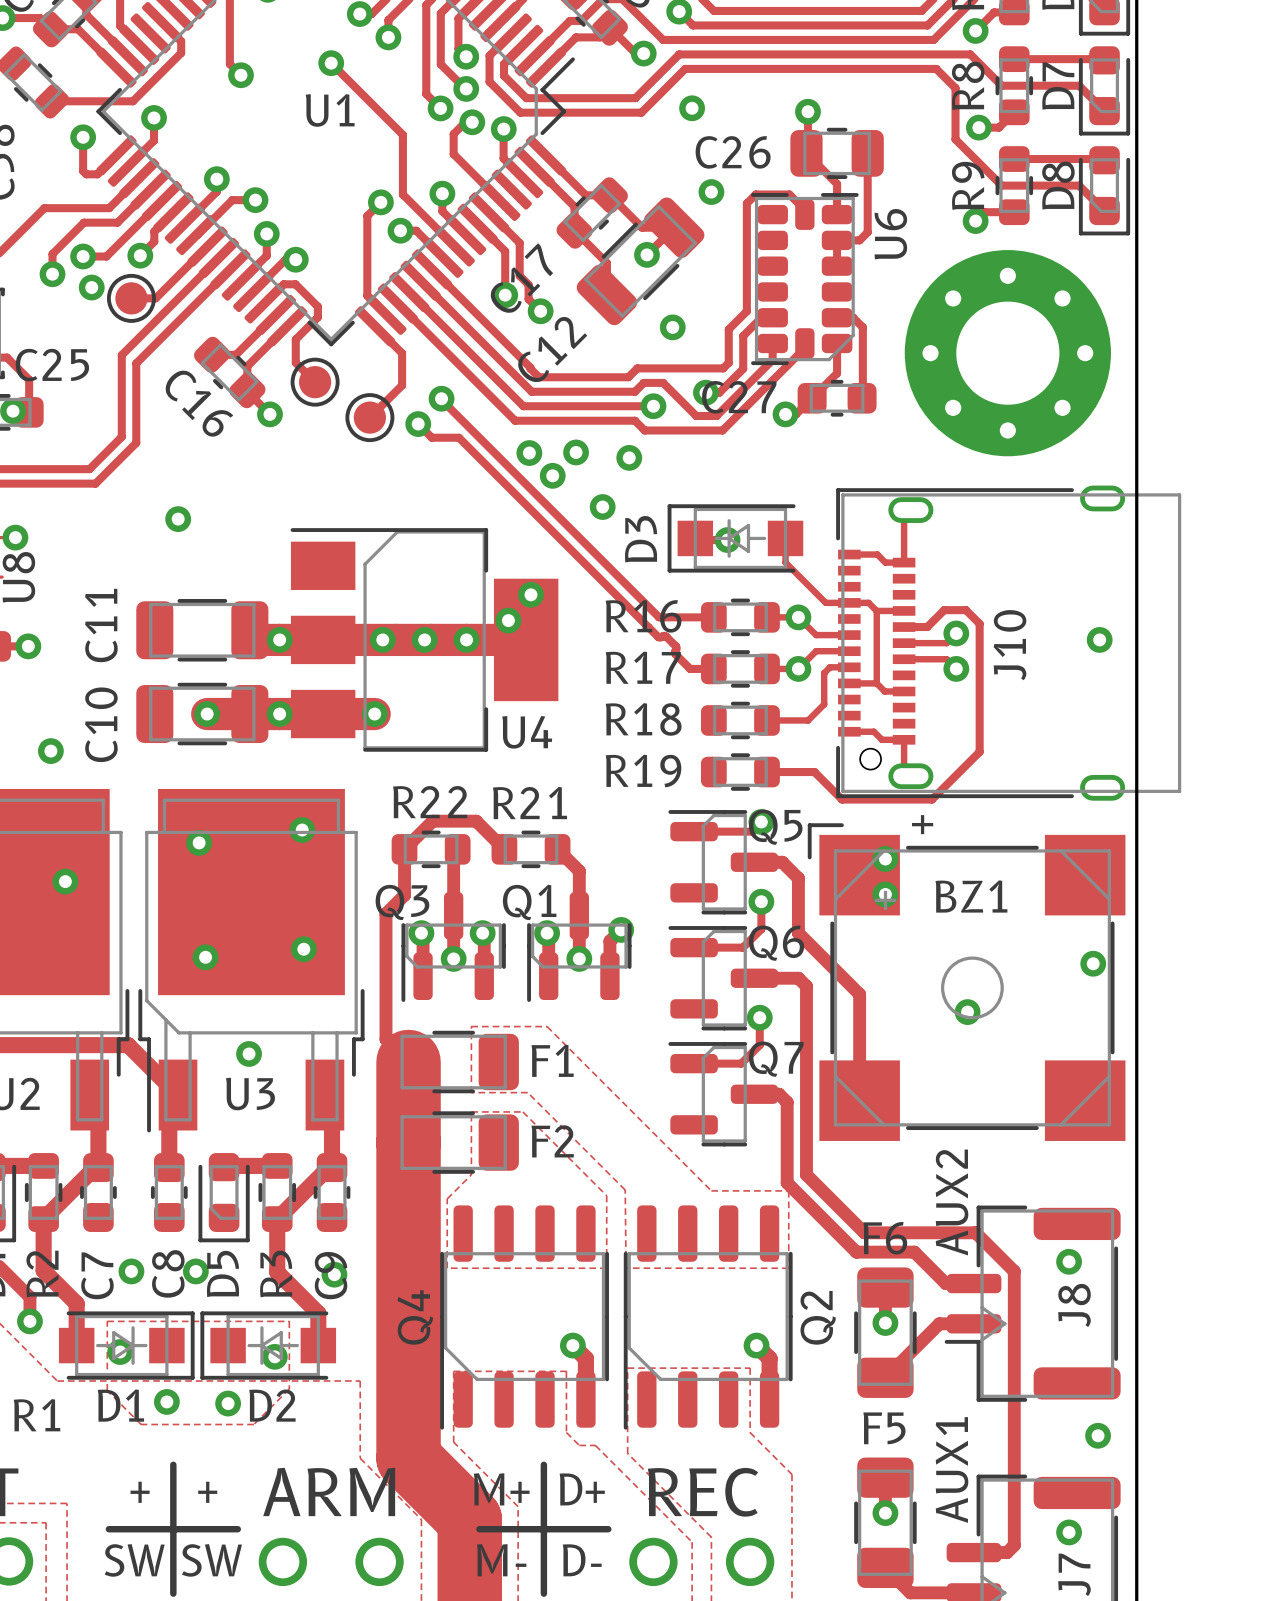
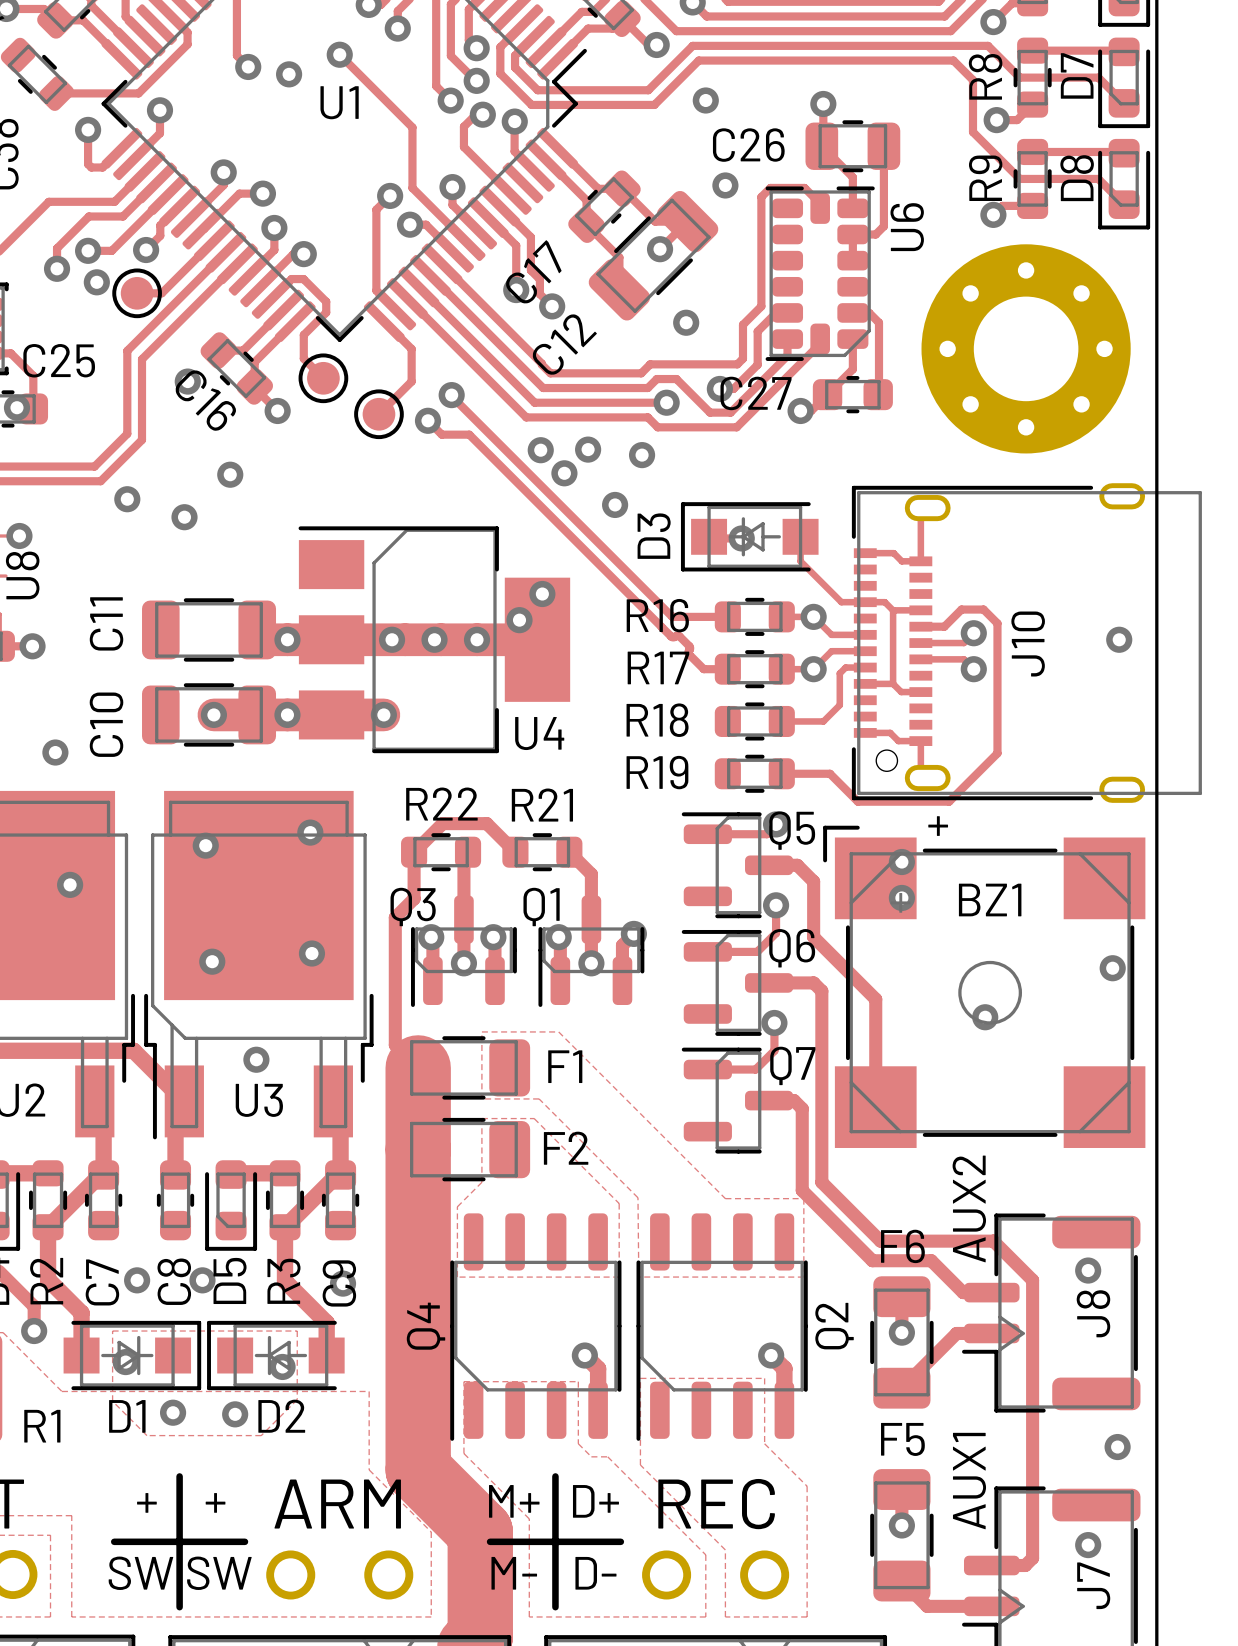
via: none -> (289, 74)
via: none -> (187, 381)
via: none -> (230, 474)
via: none -> (127, 499)

